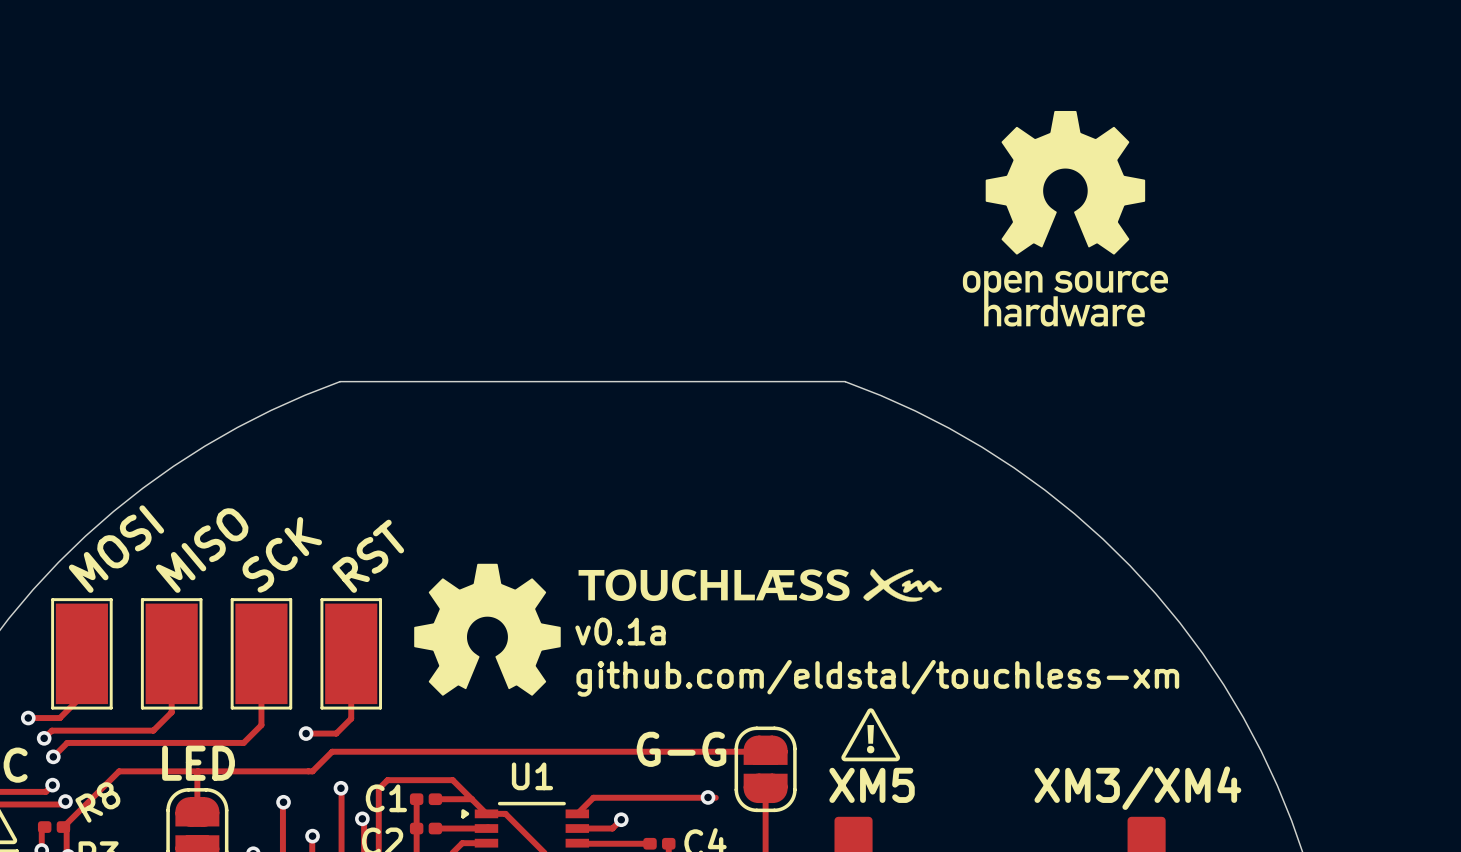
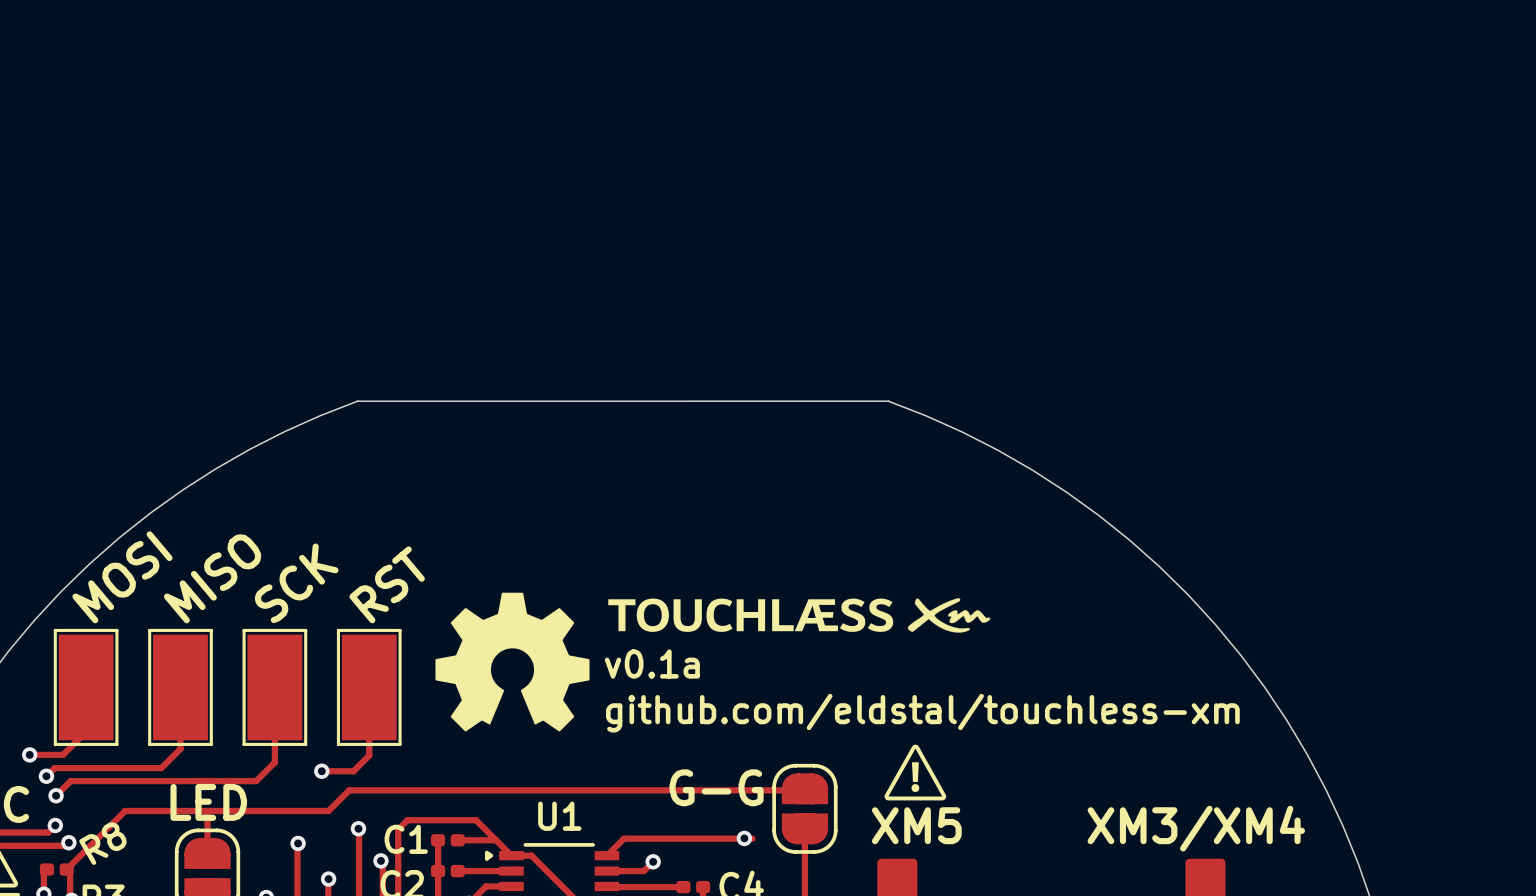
drawing: [962, 110, 1169, 327] -> none

